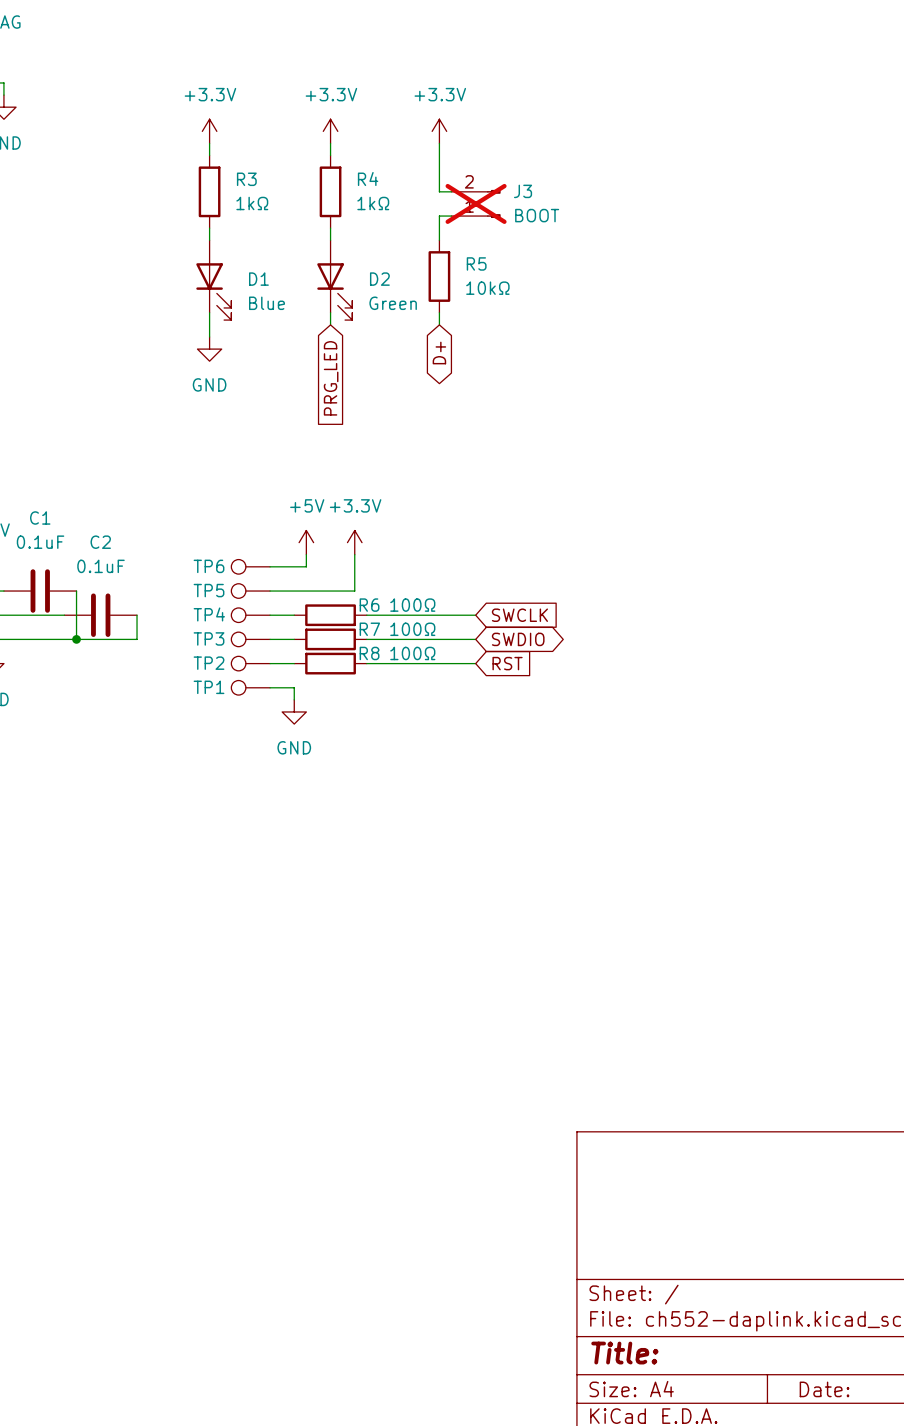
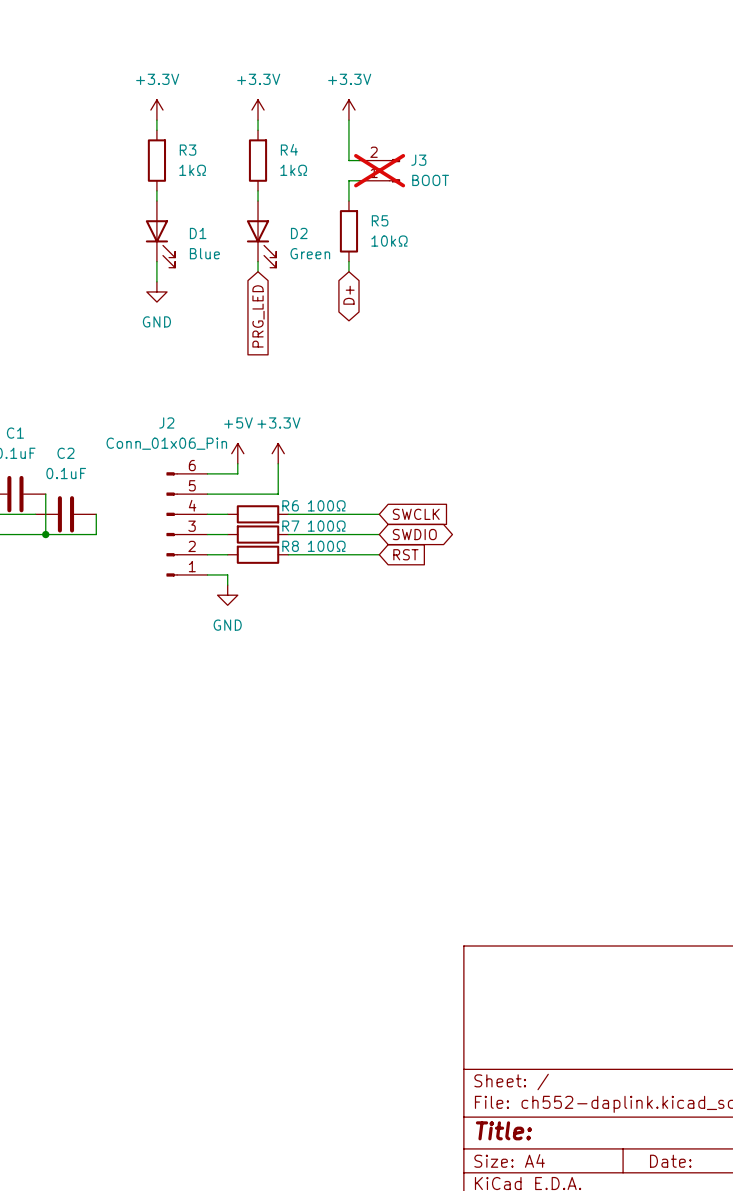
TP6: (250, 566) -> none
TP5: (250, 591) -> none
TP4: (250, 615) -> none
J2: none -> Conn_01x06_Pin (186, 524)
TP3: (250, 639) -> none
TP2: (250, 663) -> none
TP1: (250, 687) -> none

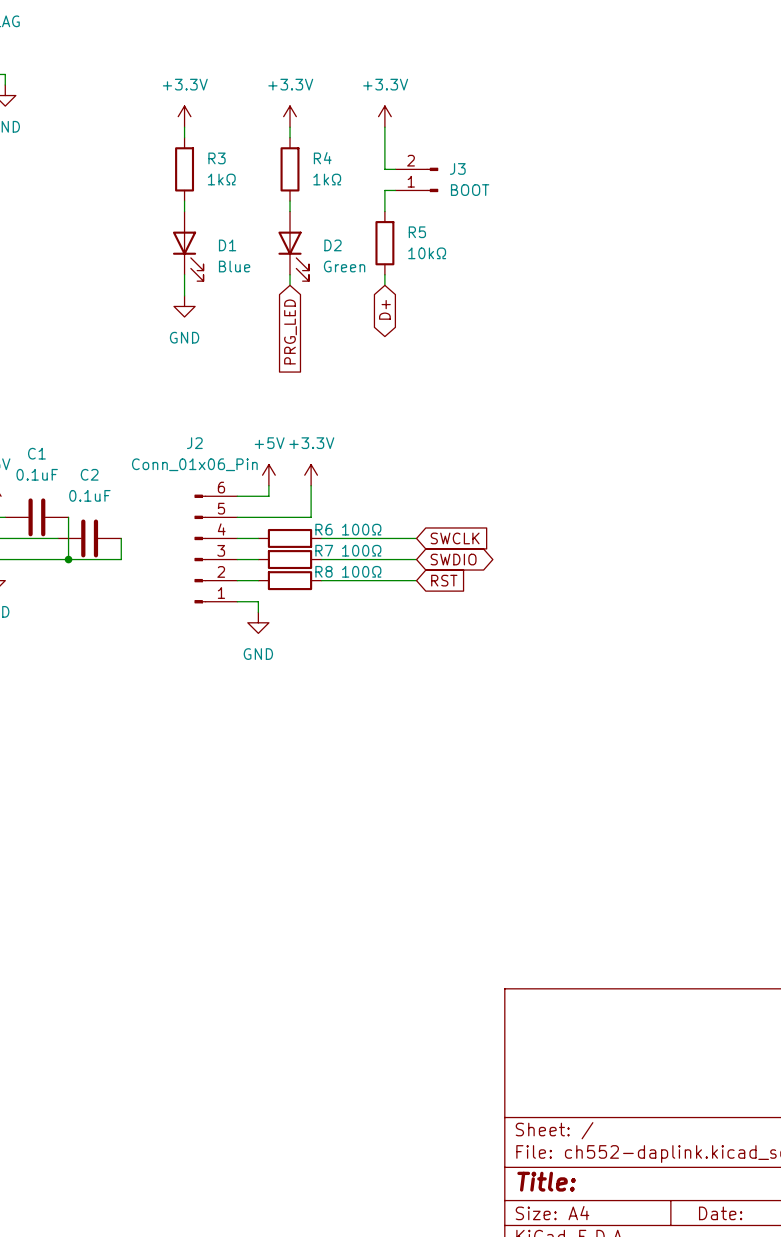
J3 do-not-place cross: (379, 170) -> none

